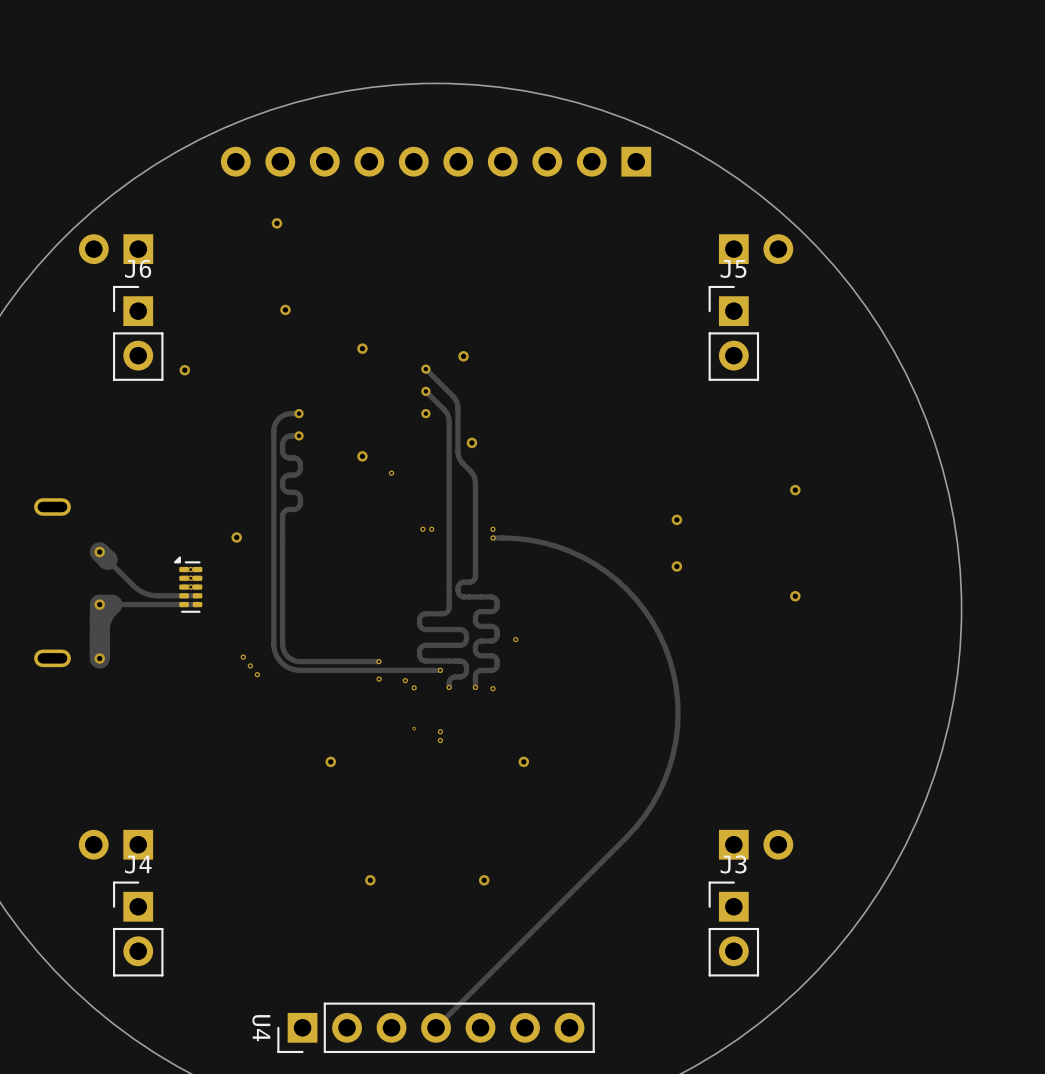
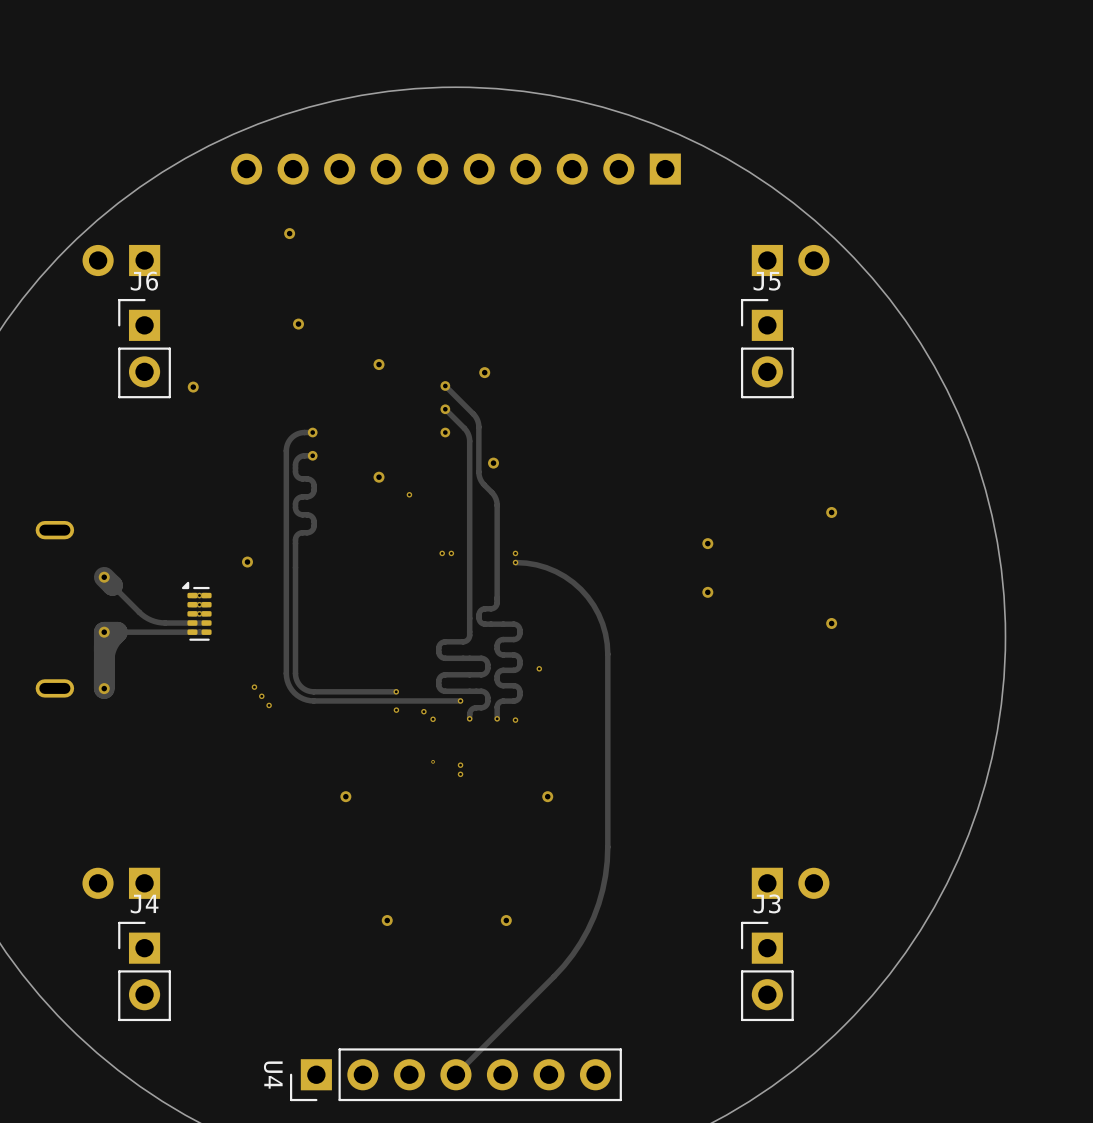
track: (493, 538) (530, 540) (557, 546) (594, 563) (616, 579) (636, 599) (659, 633) (669, 659) (677, 699) (677, 726) (673, 754) (664, 780) (652, 804) (626, 837) (529, 933) -> (516, 562) (546, 567) (573, 582) (593, 605) (602, 623) (607, 643) (607, 847) (605, 875) (598, 903) (587, 930) (572, 954) (554, 976)

